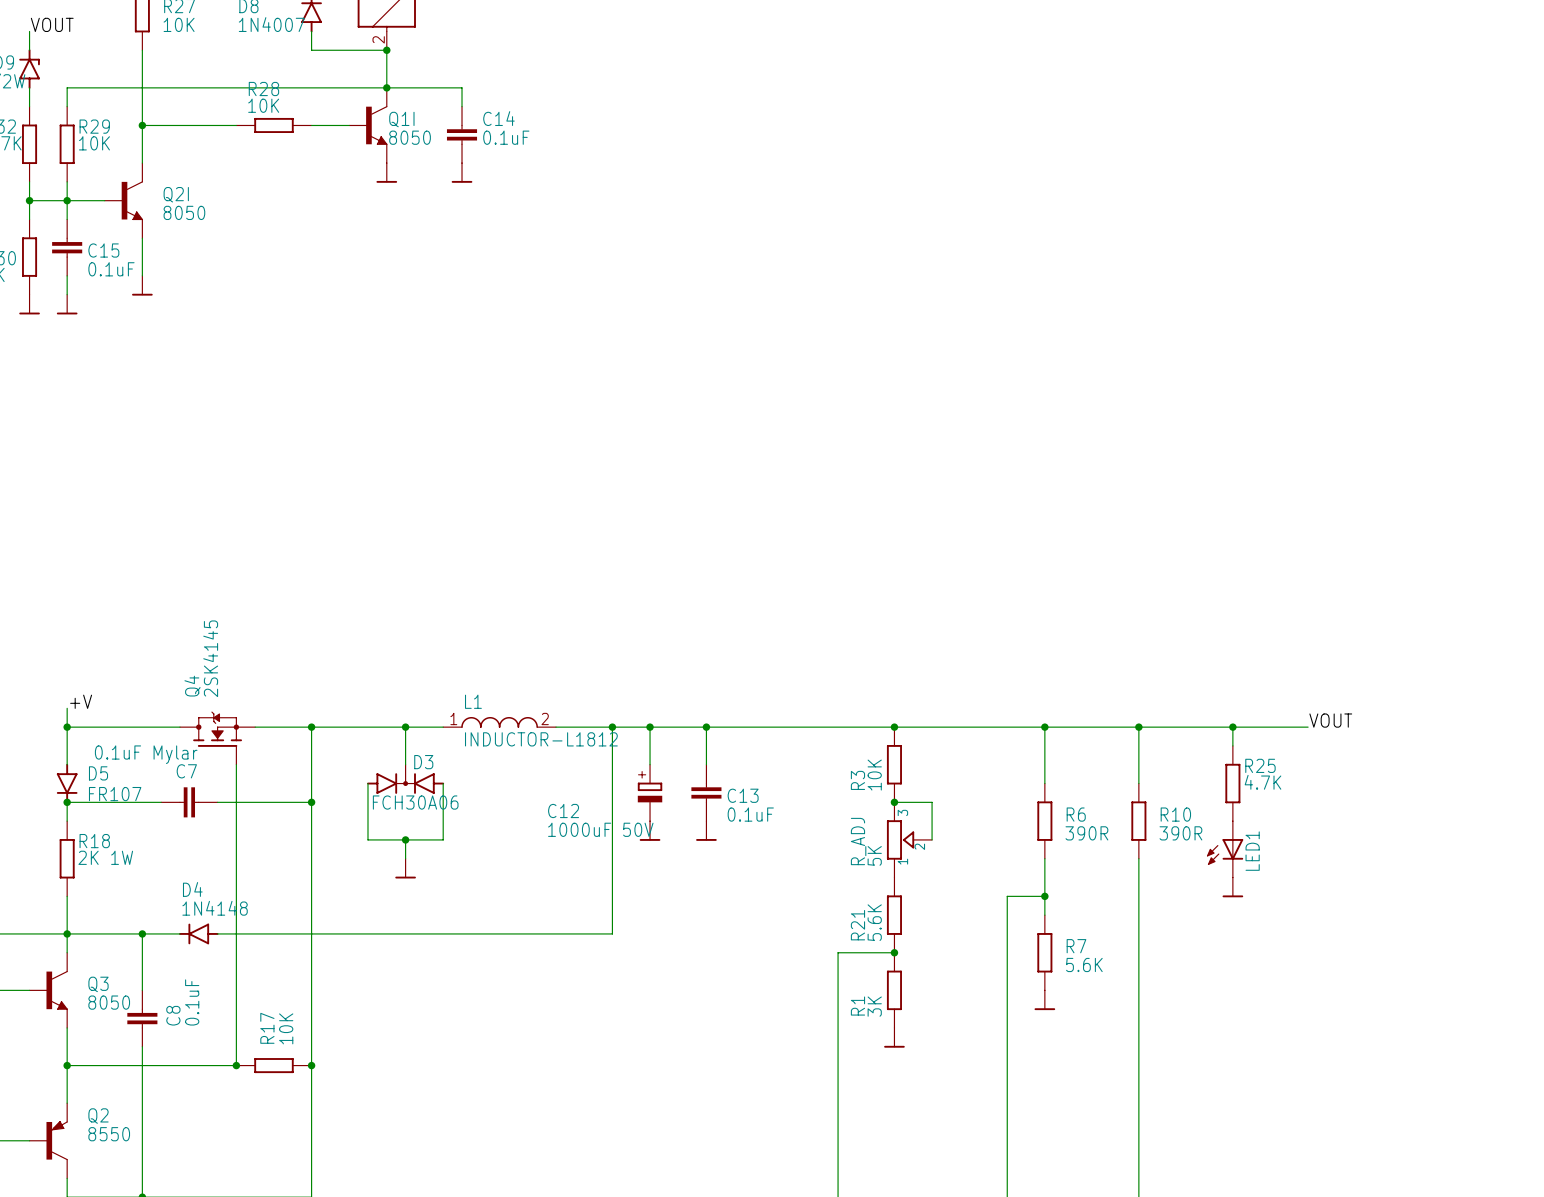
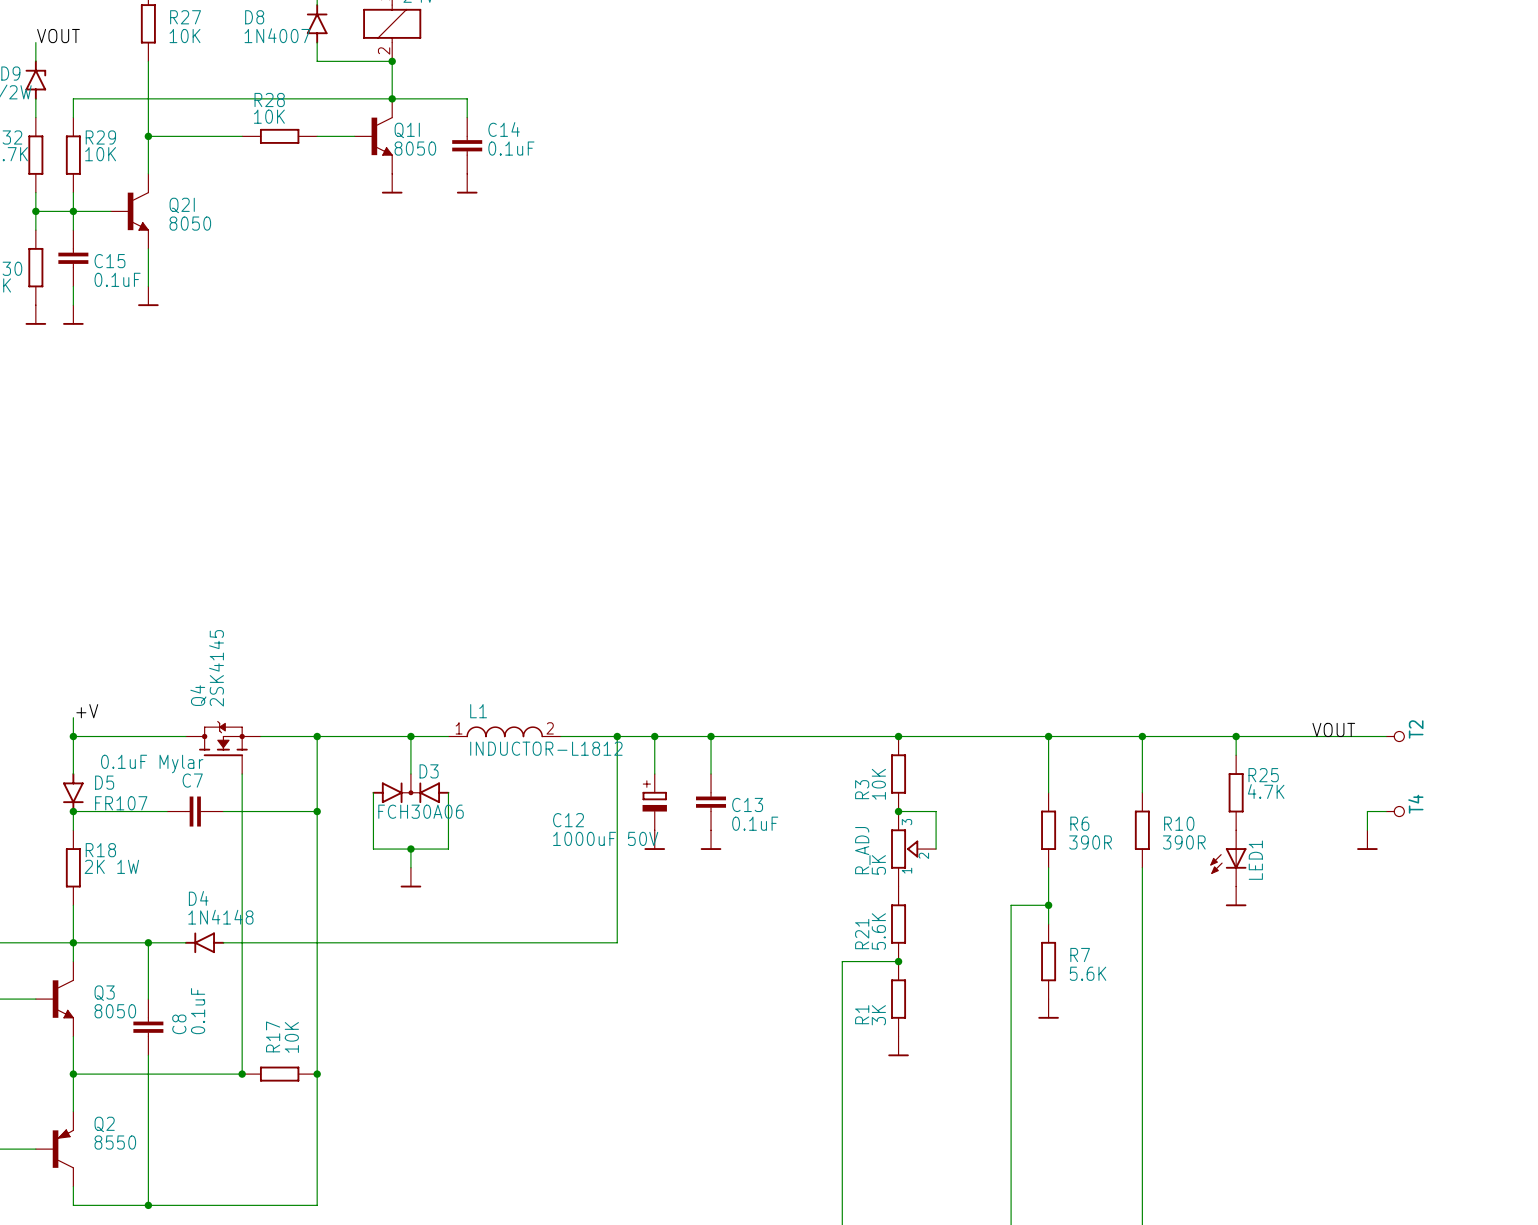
wire: none -> (1311, 736) (1386, 736)
T2: none -> (1395, 736)
wire: none -> (1386, 811) (1367, 811) (1367, 830)
T4: none -> (1395, 811)
power symbol: none -> (1367, 840)

